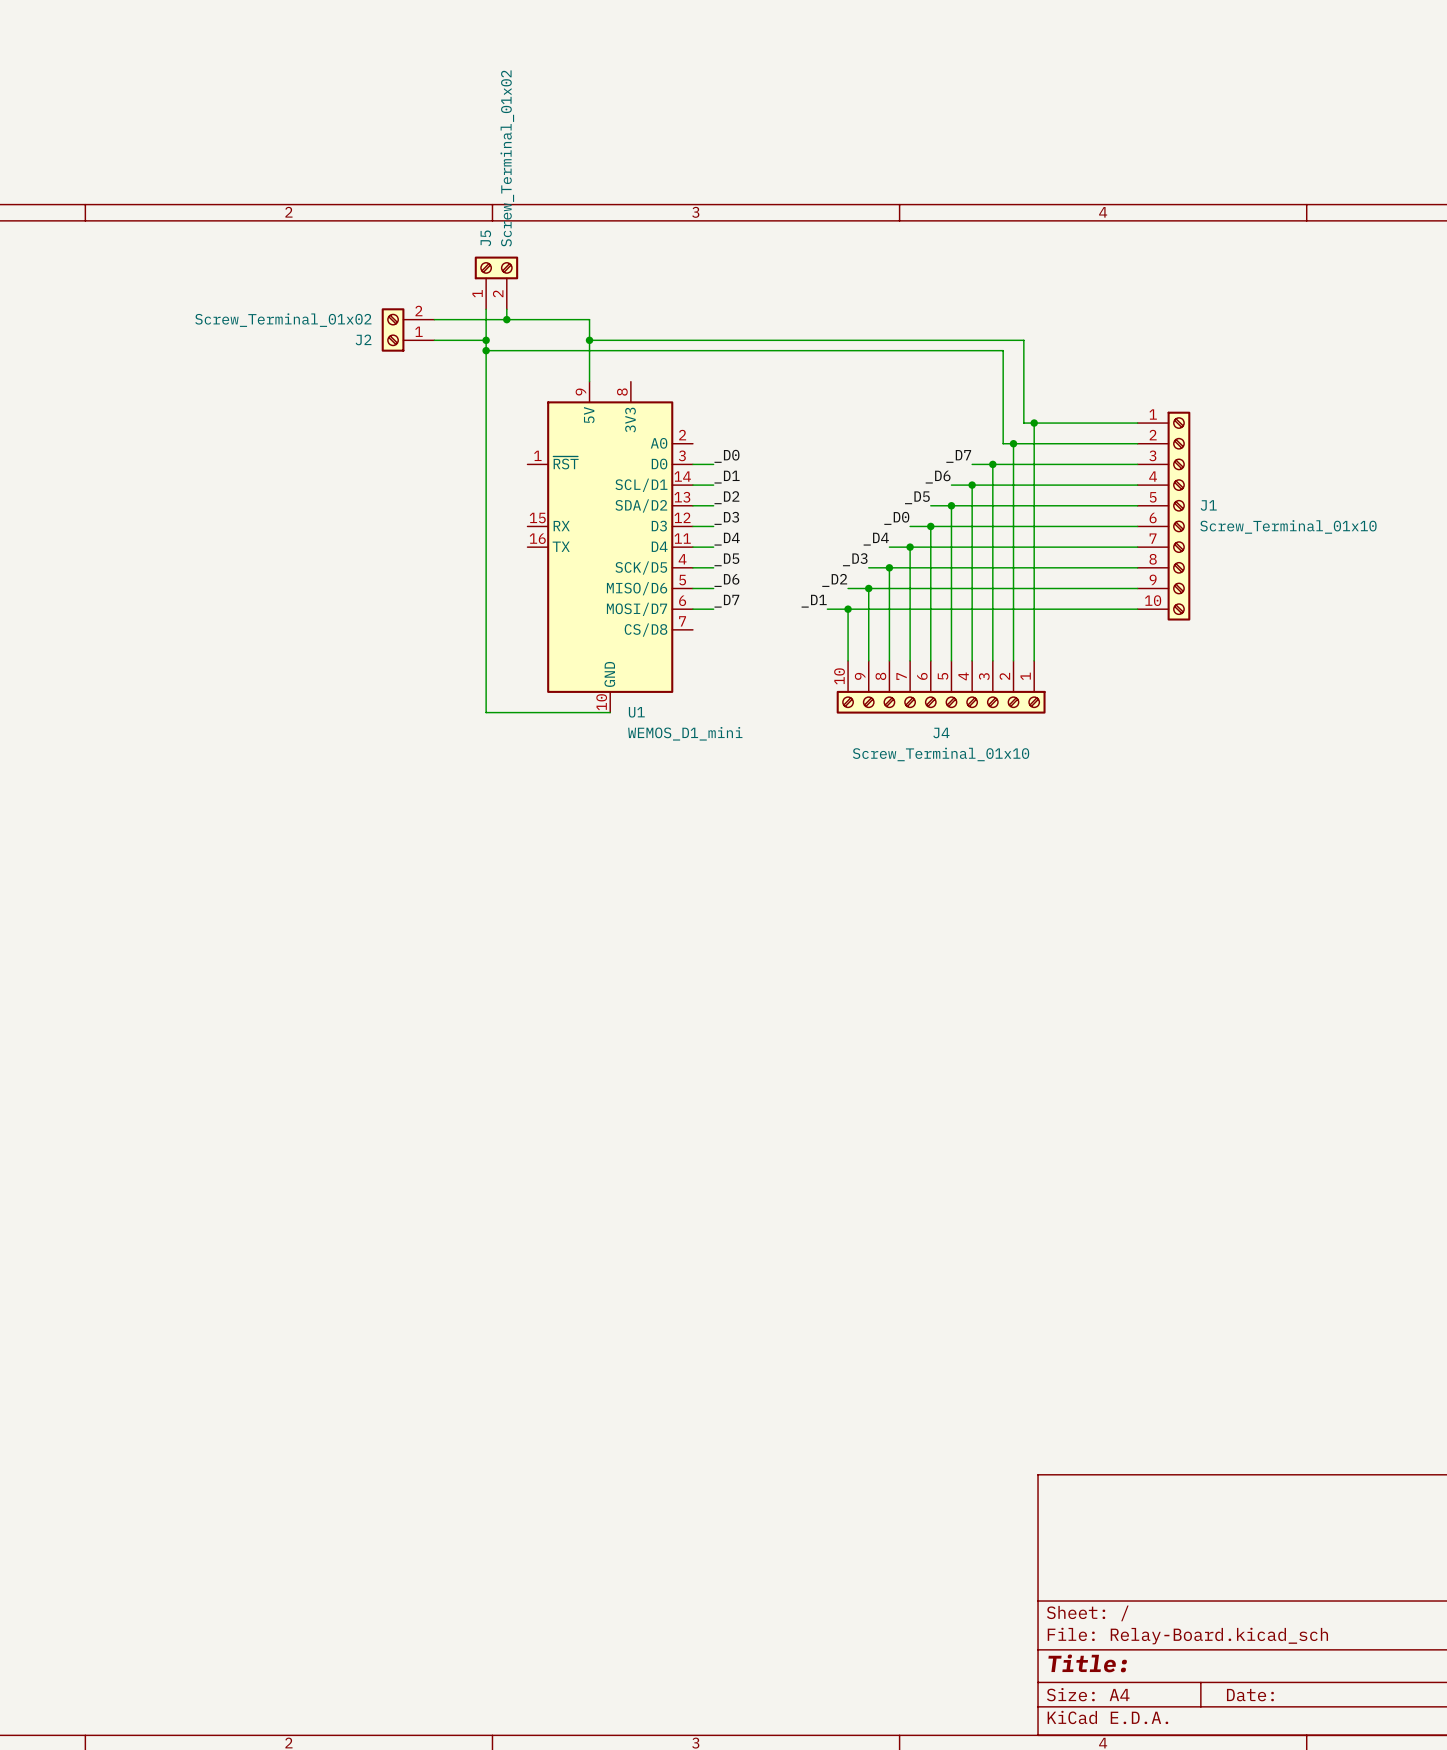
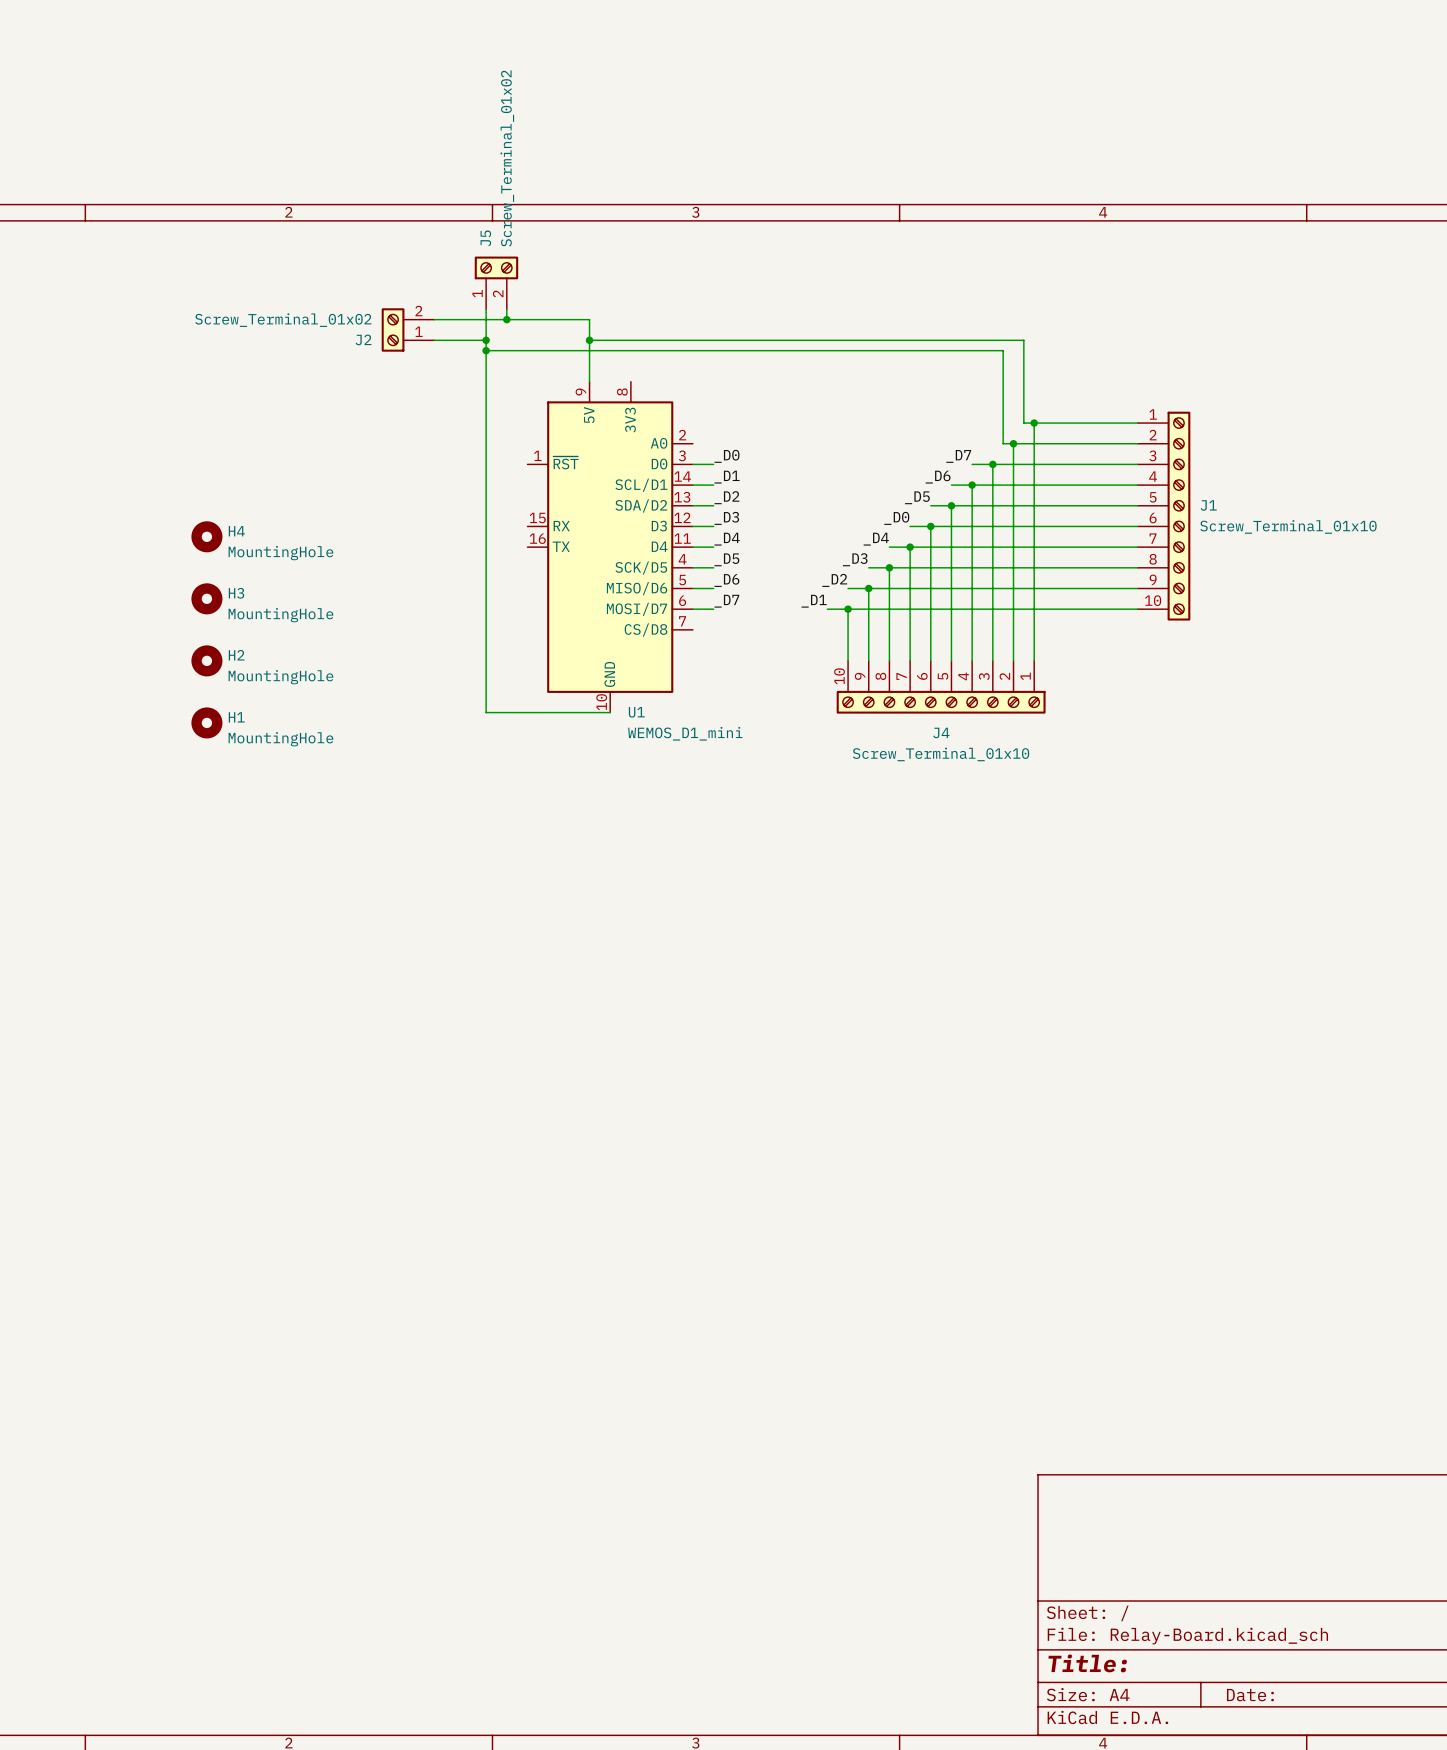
H4: none -> MountingHole (206, 536)
H3: none -> MountingHole (206, 598)
H2: none -> MountingHole (206, 660)
H1: none -> MountingHole (206, 722)

